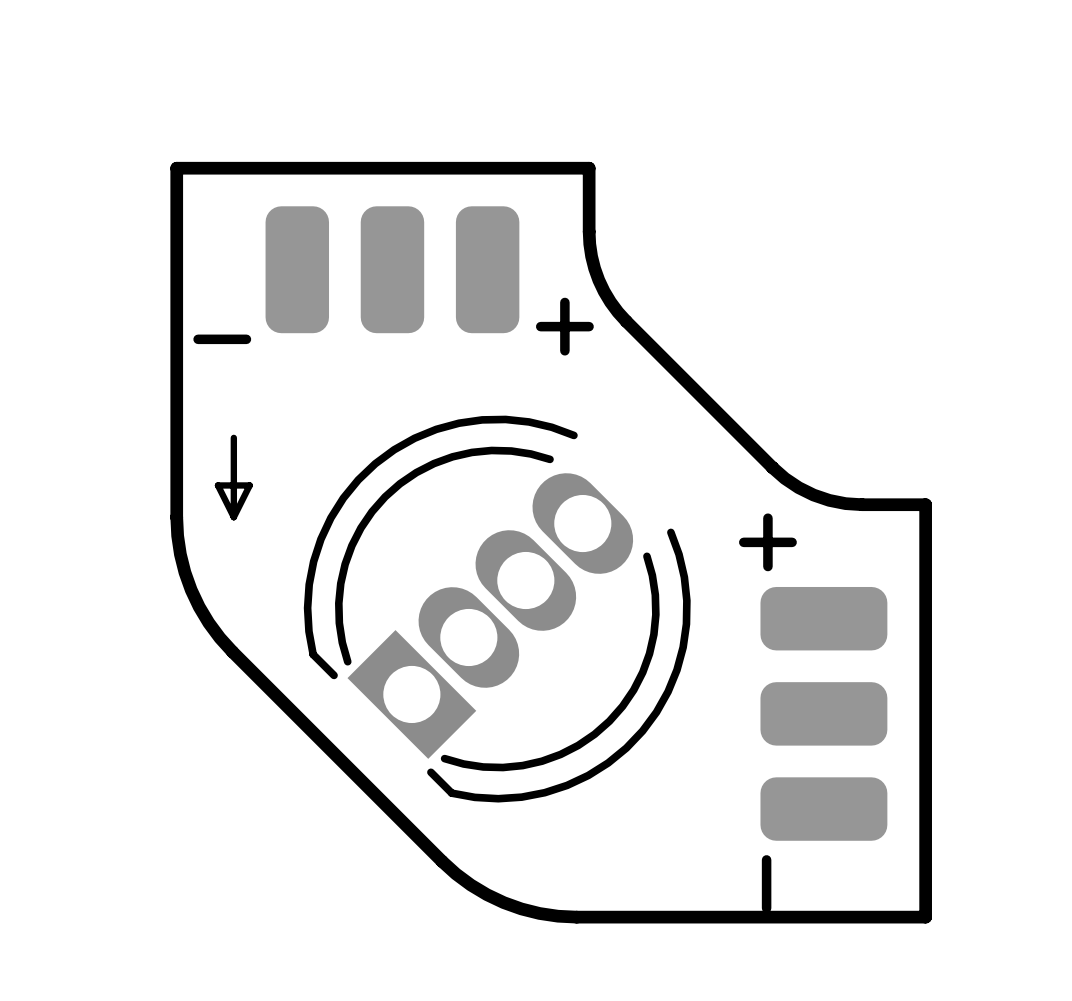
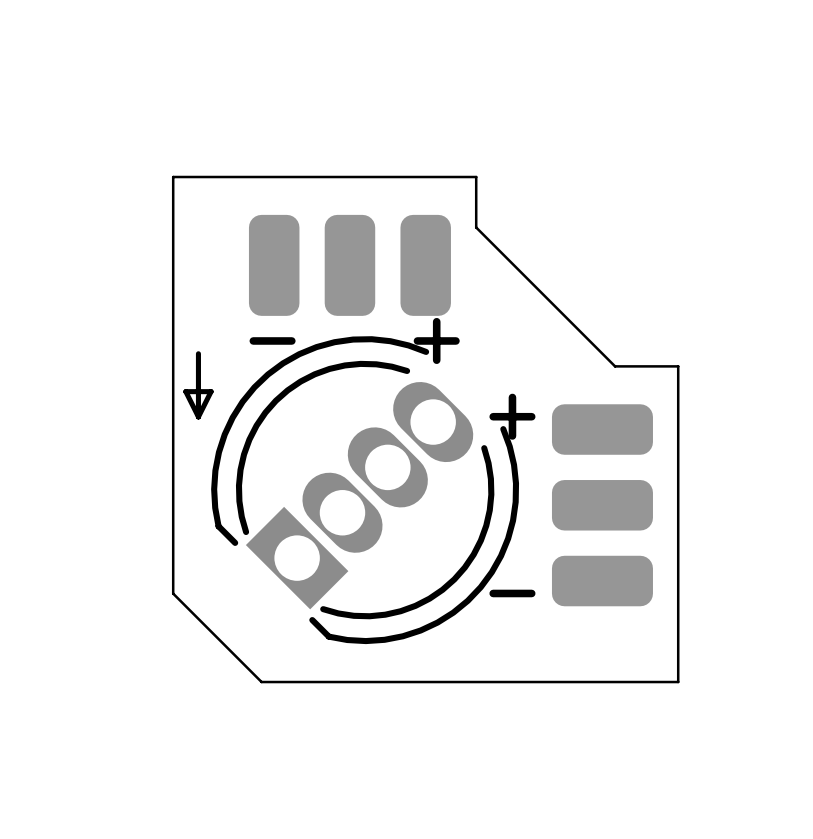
board edge: (176, 168) (589, 168) (589, 231) (591, 256) (604, 291) (626, 321) (772, 467) (798, 487) (829, 500) (845, 503) (925, 504) (925, 917) (558, 916) (521, 908) (486, 894) (455, 873) (442, 861) (232, 651) (208, 622) (191, 590) (180, 554) (176, 517) (176, 168) -> (173, 177) (173, 593) (261, 682) (678, 682) (678, 366) (615, 366) (476, 227) (476, 177) (173, 177)
part: (297, 269) -> none
part: (392, 269) -> none
part: (487, 269) -> none
part: none -> (274, 265)
part: none -> (349, 265)
part: none -> (425, 265)
text position: + (564, 326) -> + (436, 340)
text position: - (222, 339) -> - (272, 340)
text: none -> + (512, 416)
part: none -> (602, 429)
text: + (767, 542) -> none
part position: (497, 609) -> (365, 490)
part: (823, 618) -> none
part: none -> (602, 505)
part: (823, 713) -> none
part: none -> (602, 581)
part: (823, 809) -> none
text rotation: 0° (766, 884) -> 90° clockwise (512, 593)
text position: - (766, 884) -> - (512, 593)

